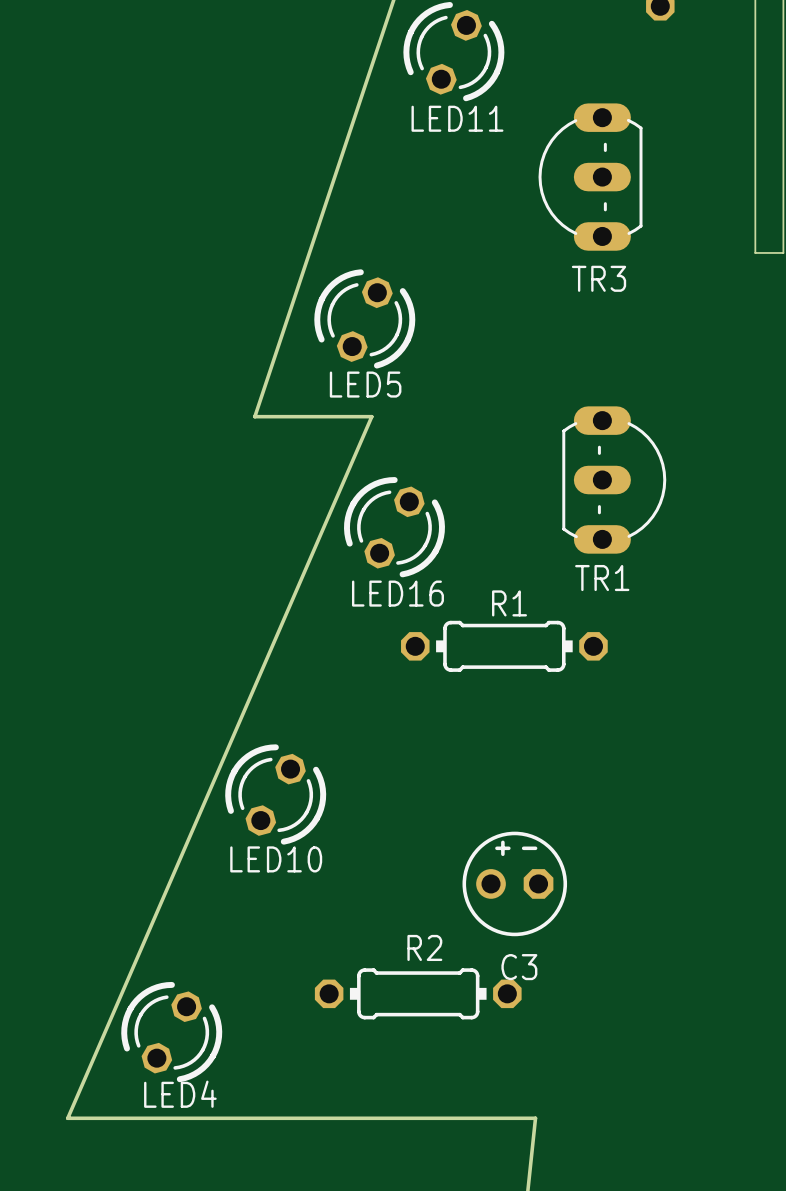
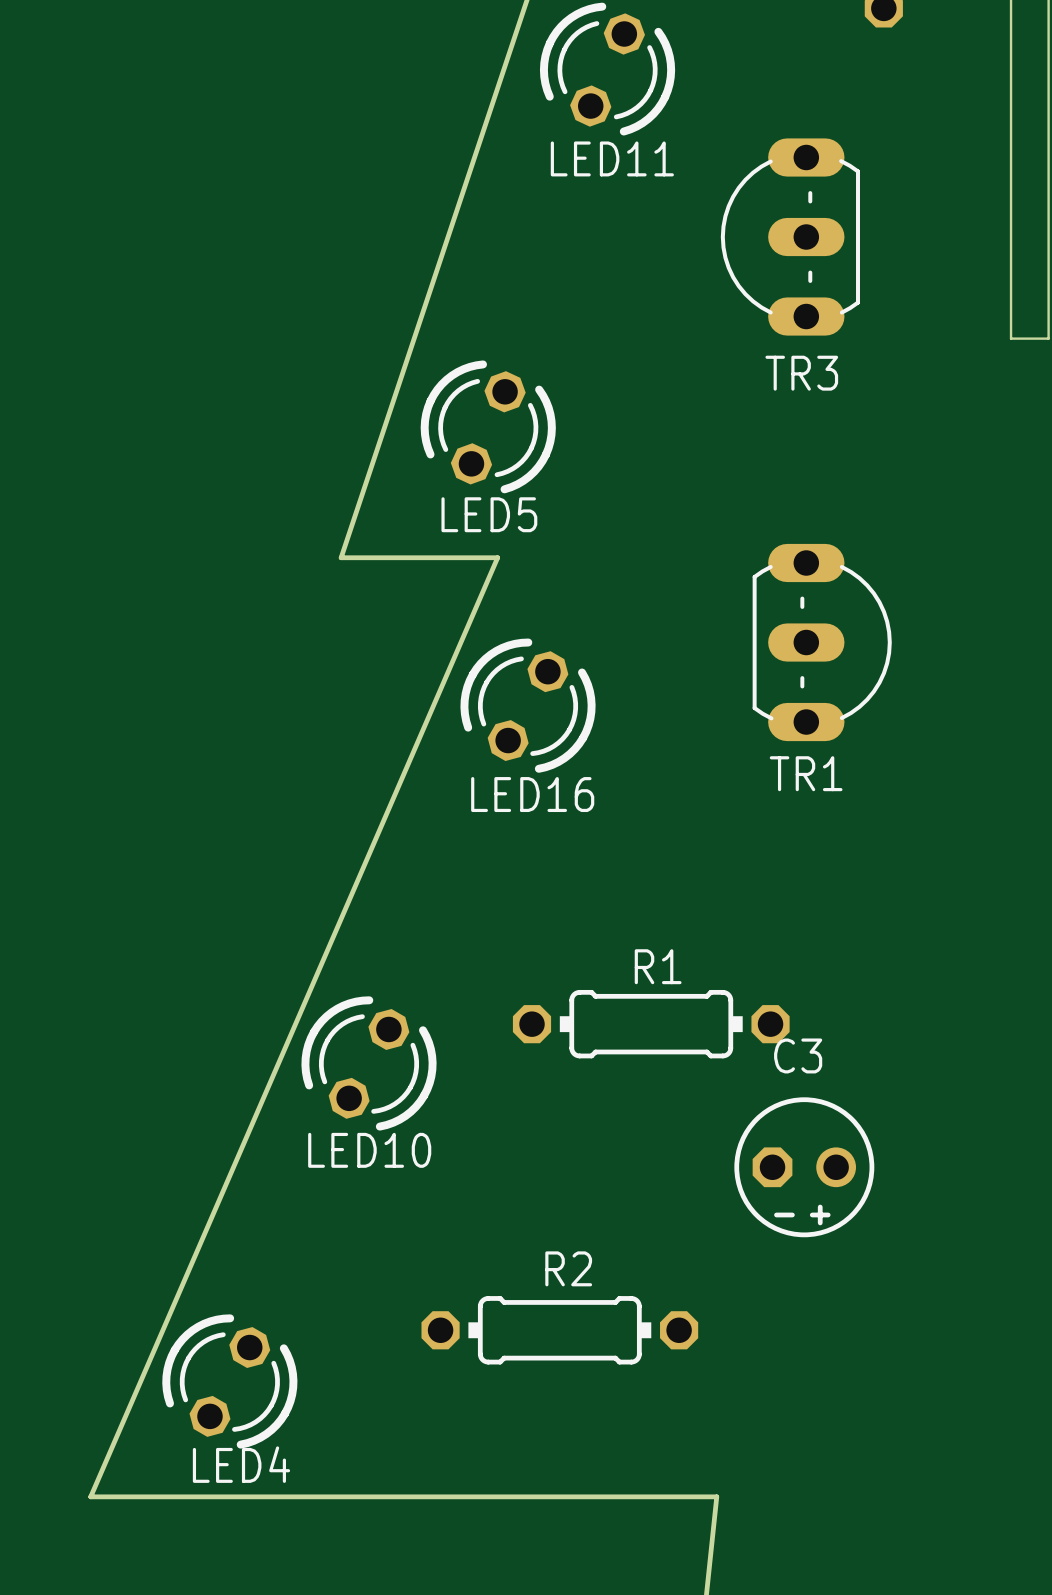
R1 position: (504, 646) -> (651, 1024)
C3 rotation: 0° (514, 883) -> 180° (804, 1167)
C3 position: (514, 883) -> (804, 1167)

